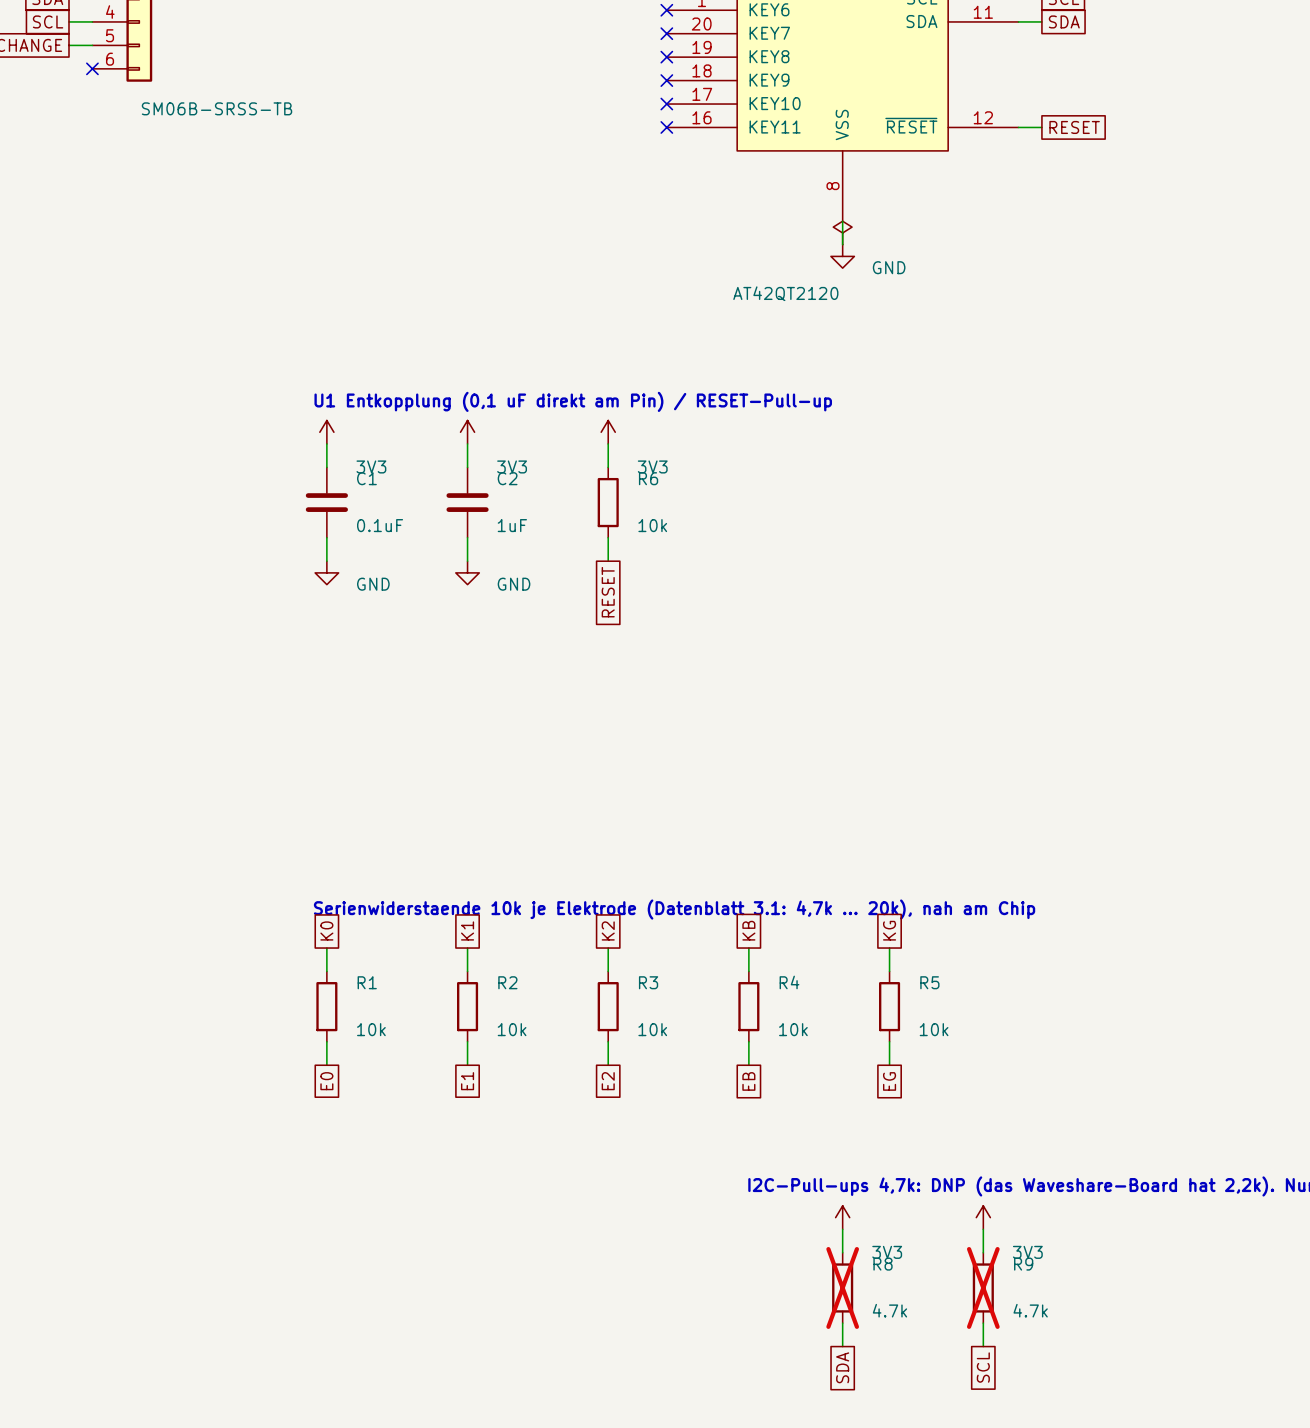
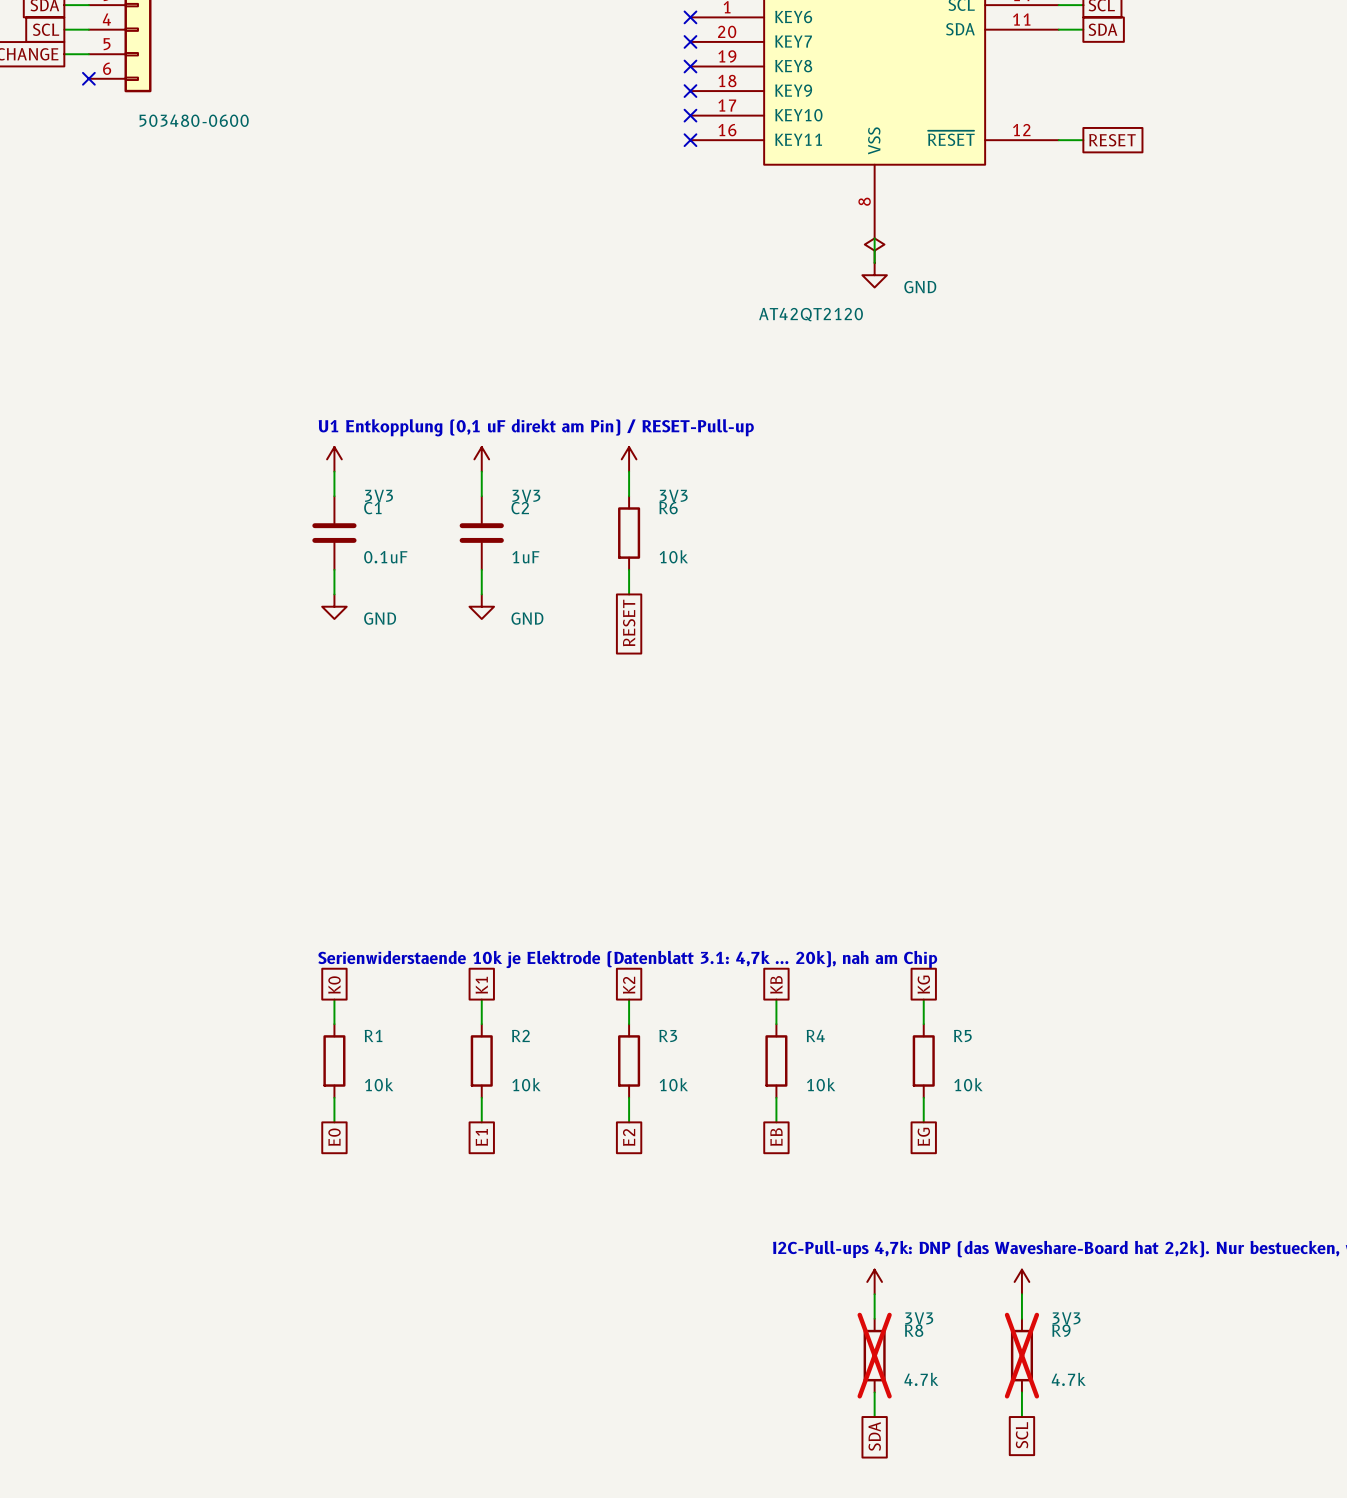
part value: SM06B-SRSS-TB (217, 108) -> 503480-0600 (194, 120)

